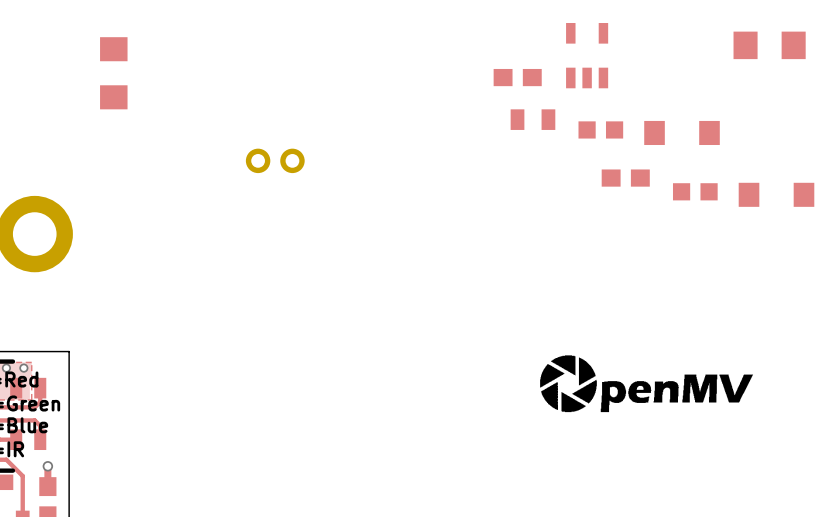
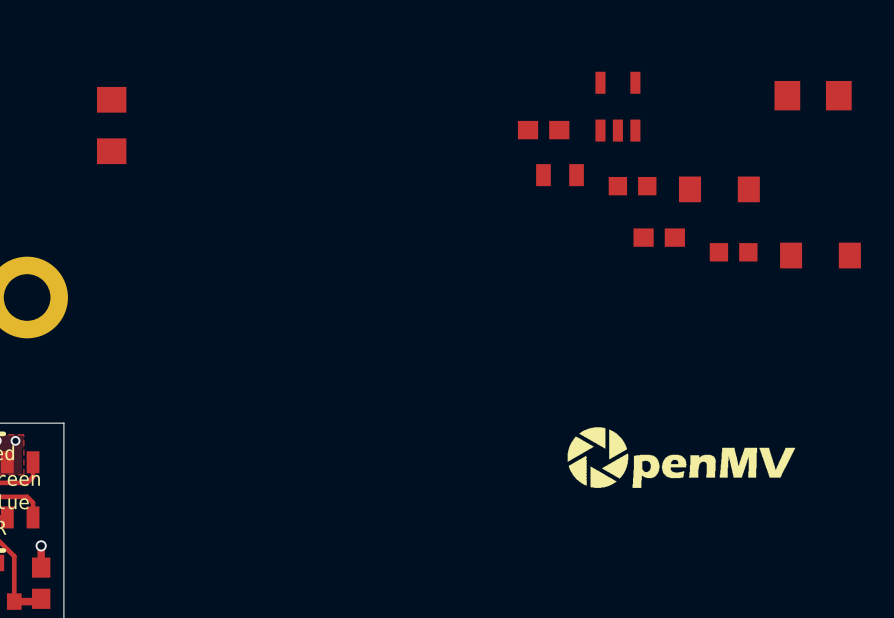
part: (275, 160) -> none

